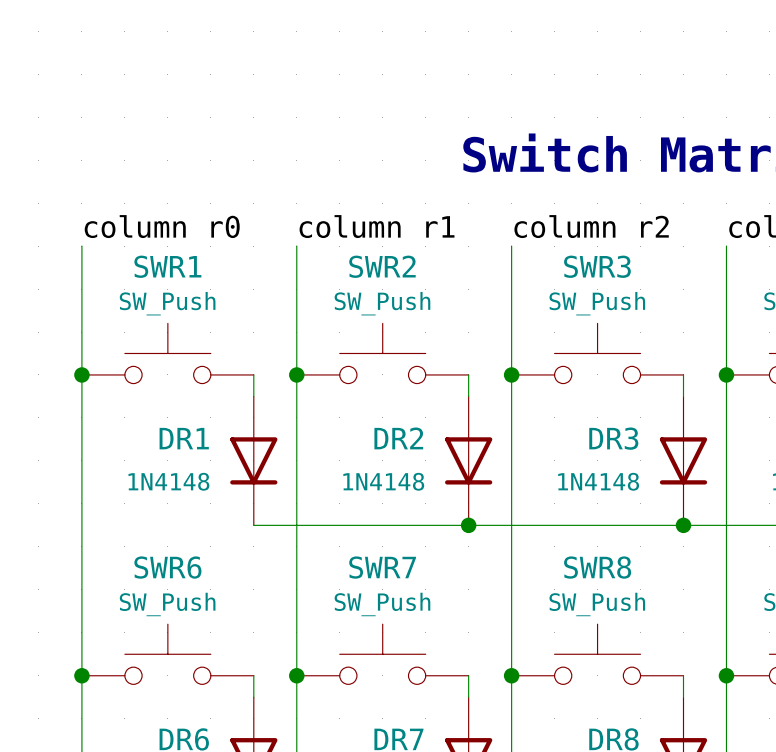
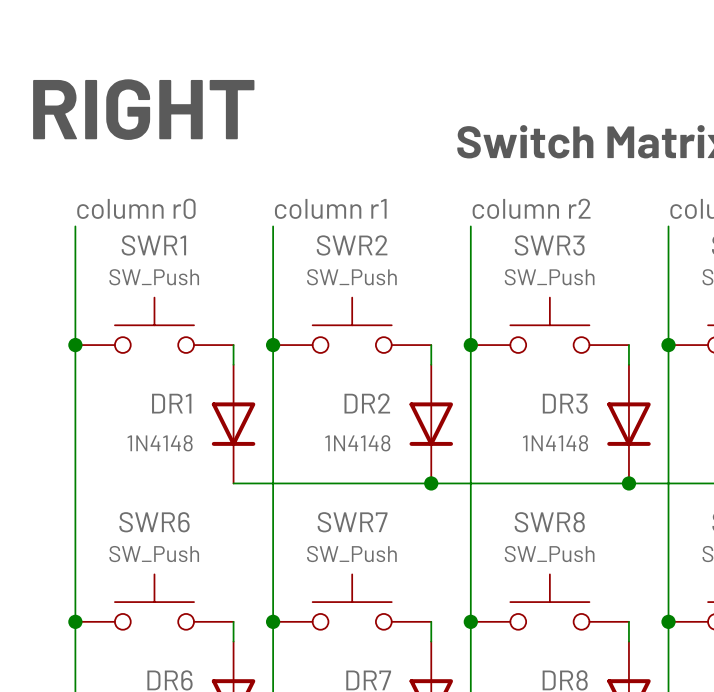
text: none -> RIGHT (143, 109)

